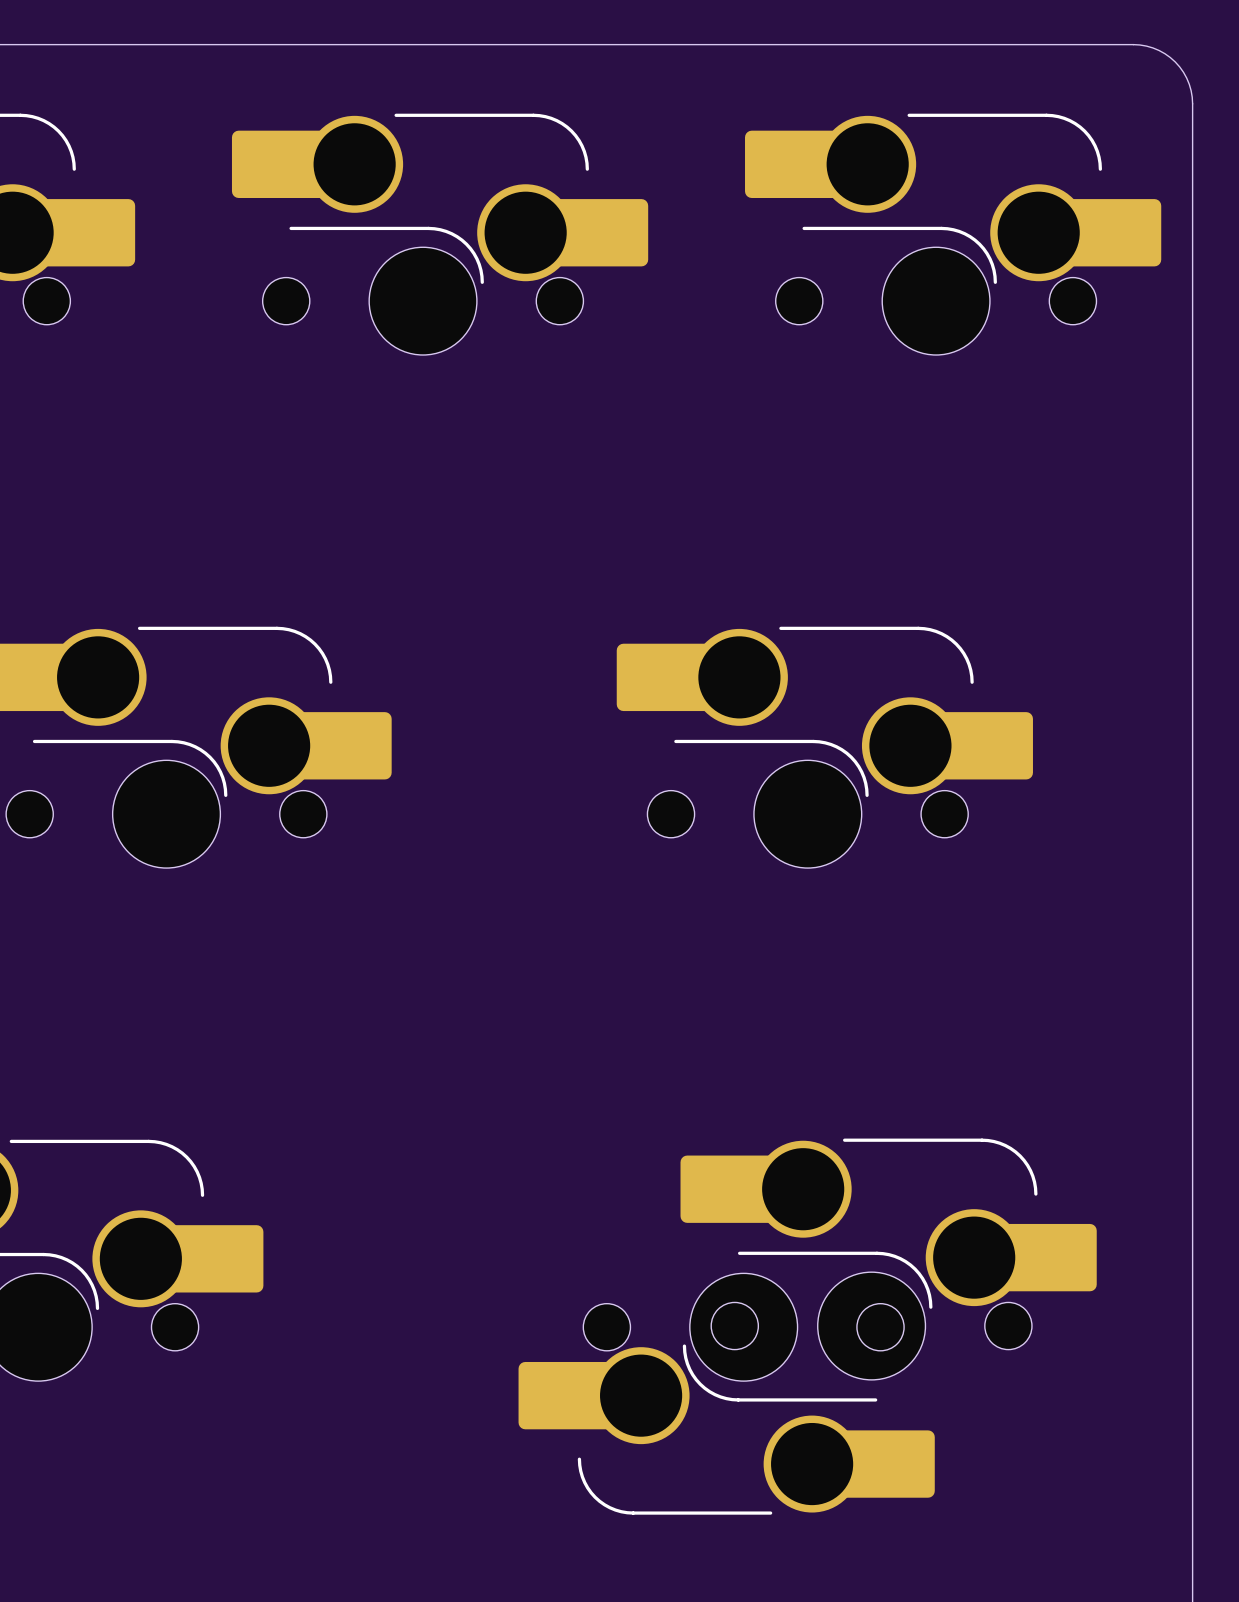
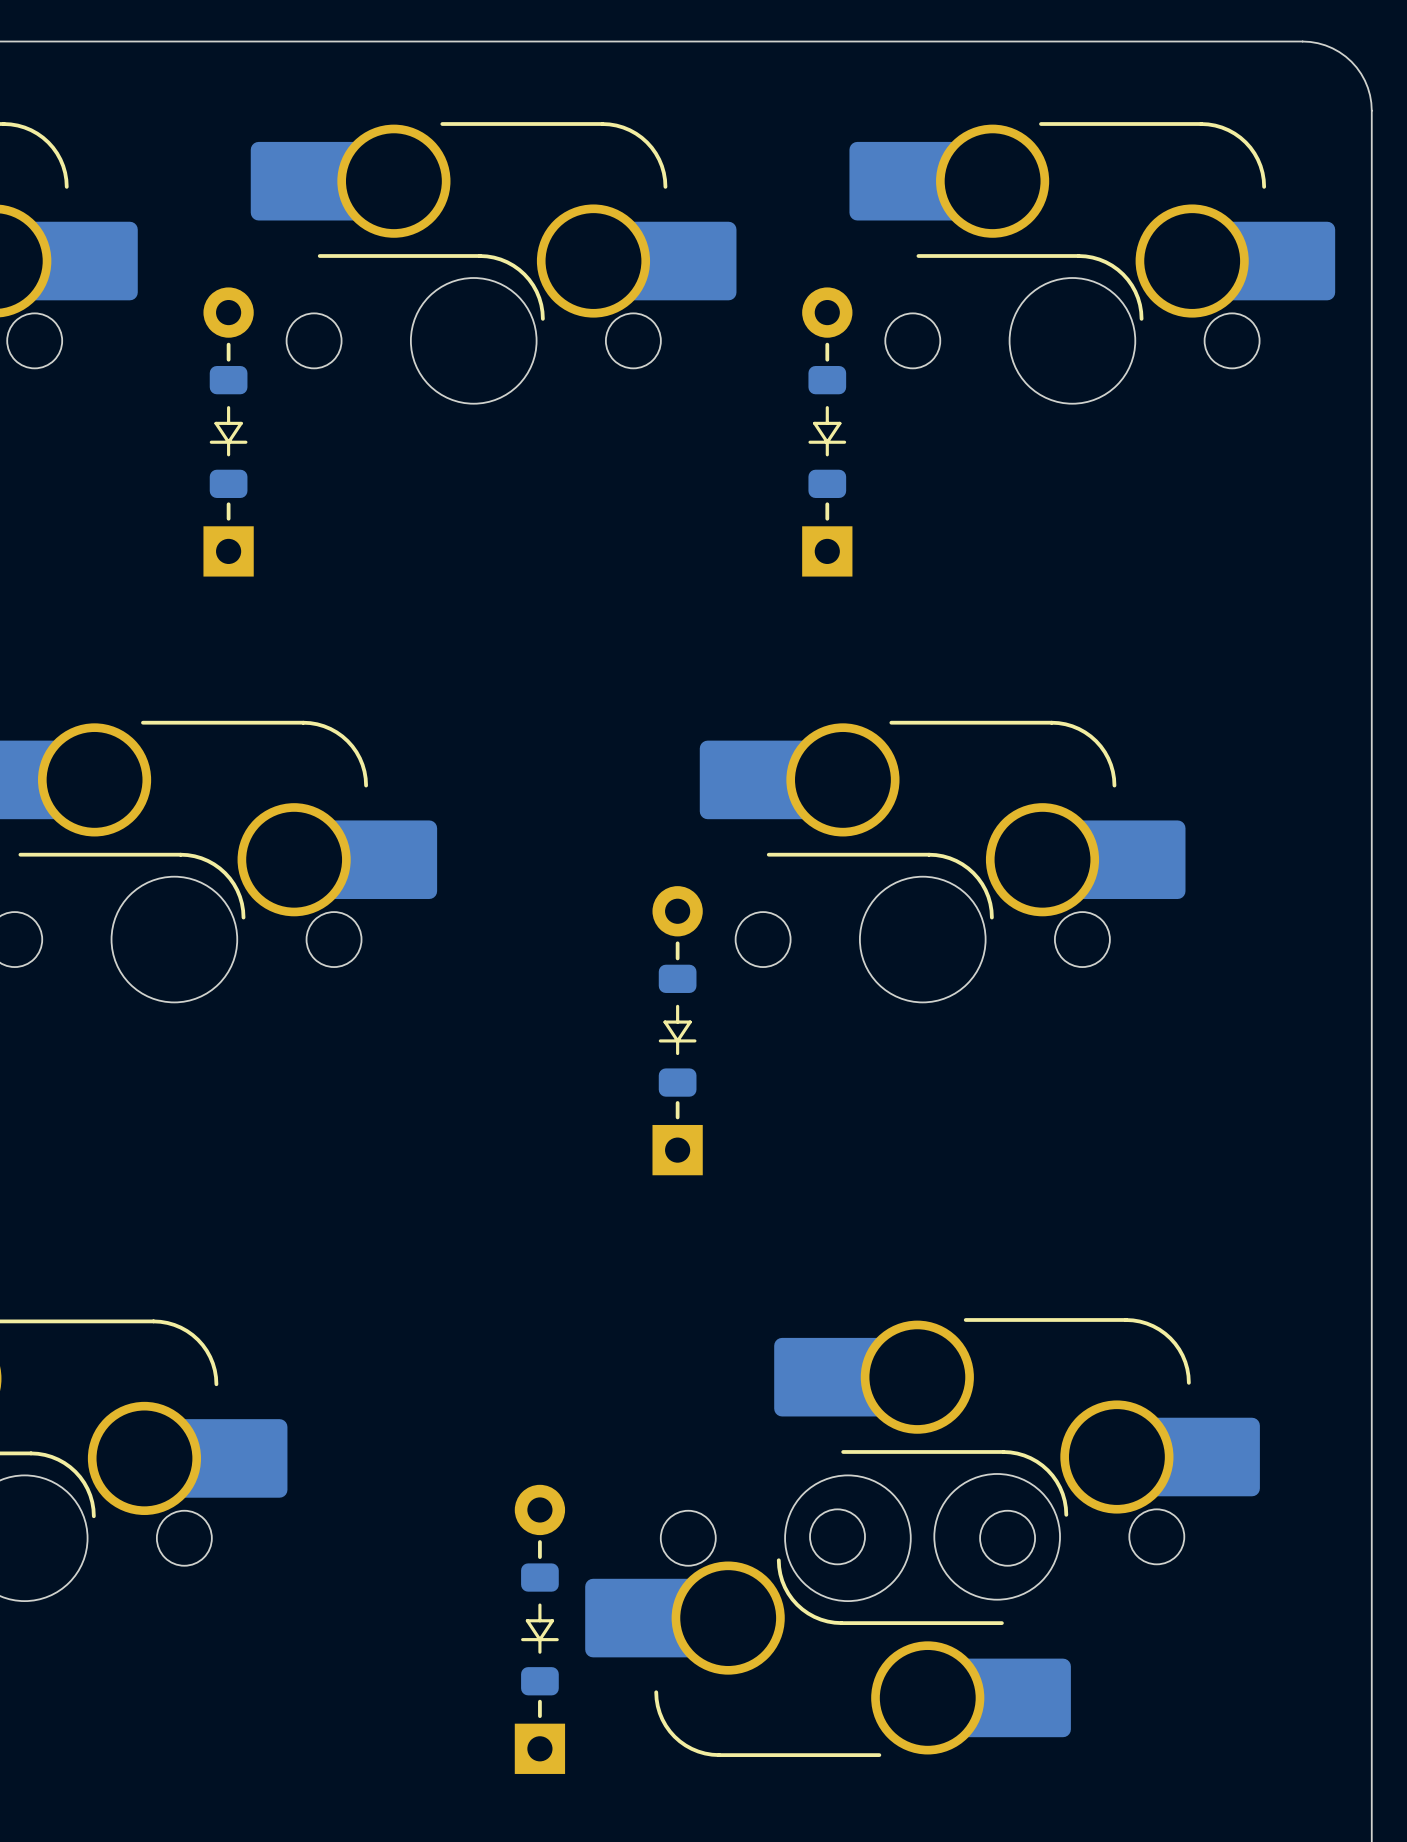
part: none -> (228, 432)
part: none -> (827, 432)
part: none -> (677, 1030)
part: none -> (539, 1629)

